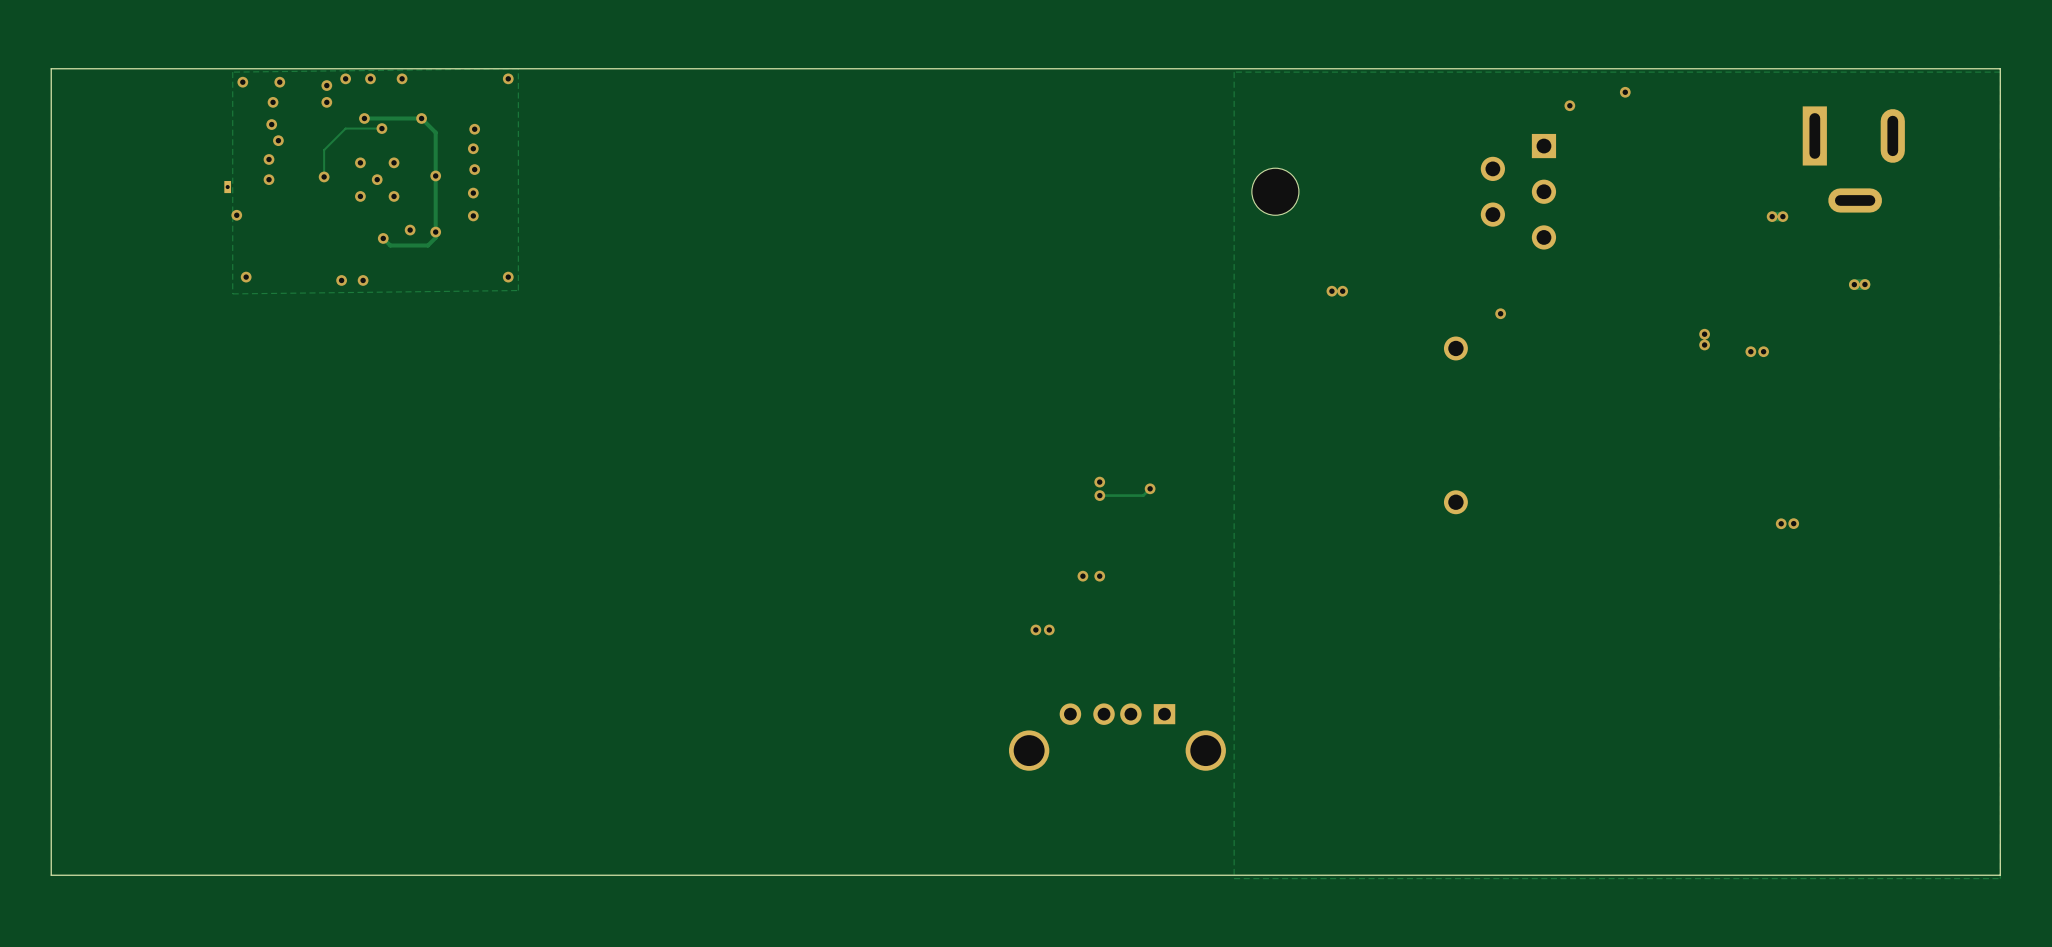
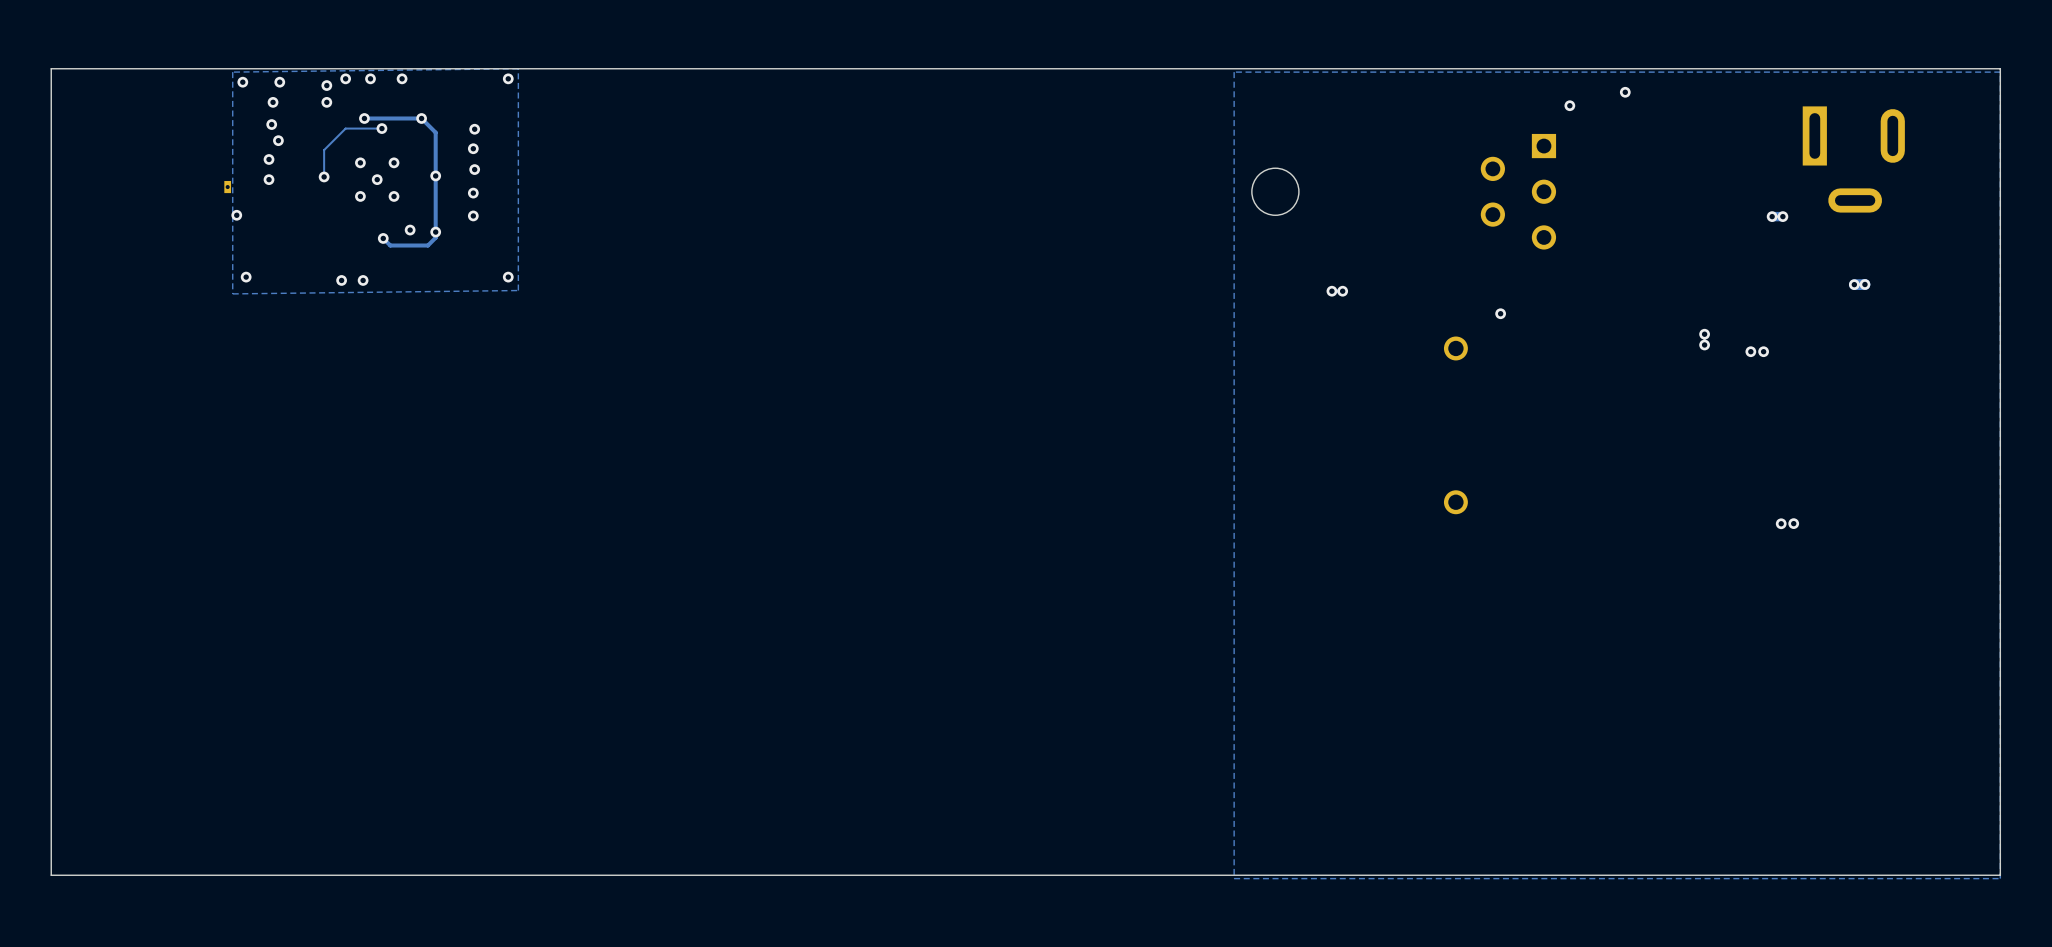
via: (1099, 482) -> none
track: (1150, 488) (1143, 495) (1099, 495) -> none
via: (1150, 488) -> none
via: (1099, 495) -> none
via: (1082, 576) -> none
via: (1099, 576) -> none
via: (1035, 629) -> none
via: (1049, 629) -> none
part: (1117, 737) -> none

